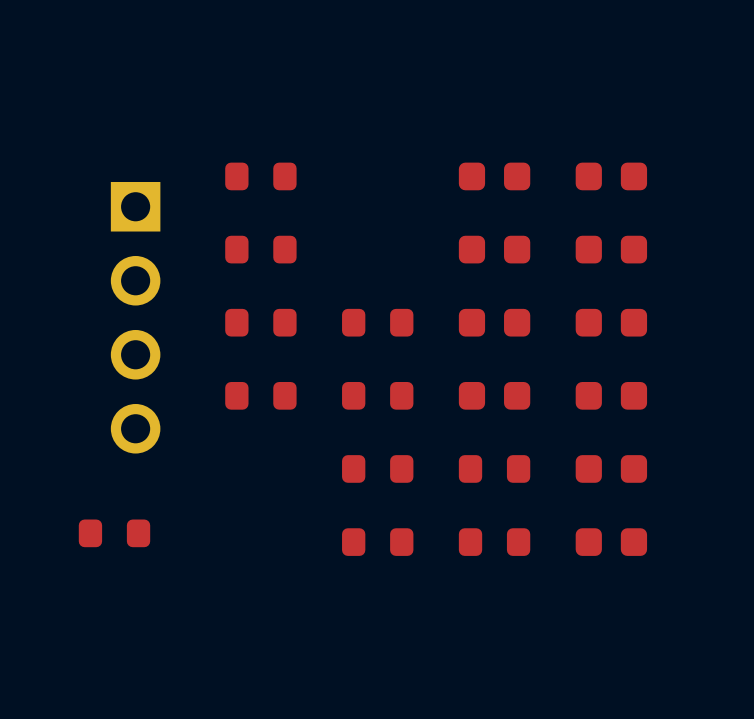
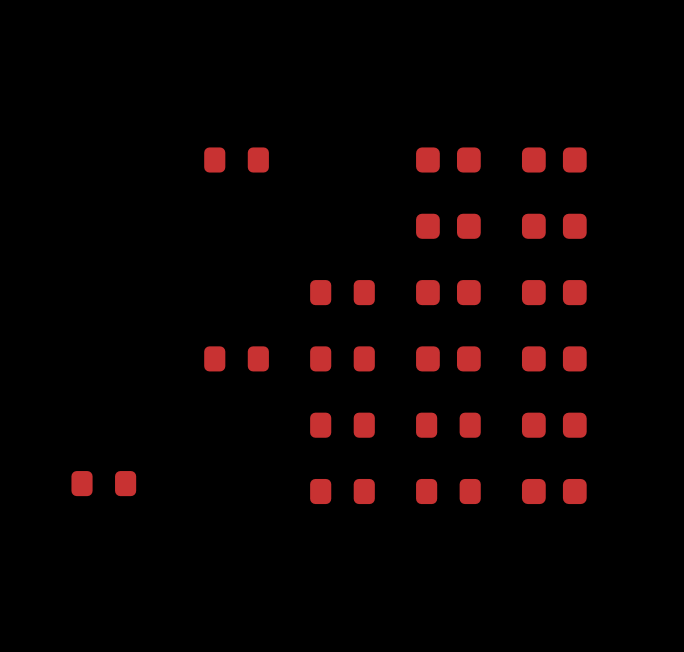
part: (260, 249) -> none
part: (135, 317) -> none
part: (260, 322) -> none

